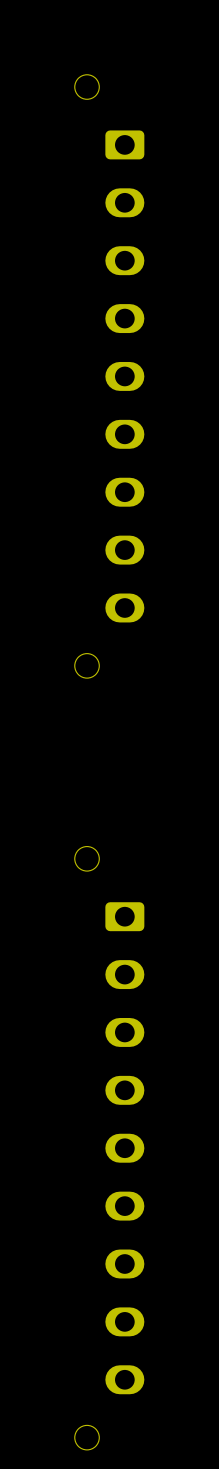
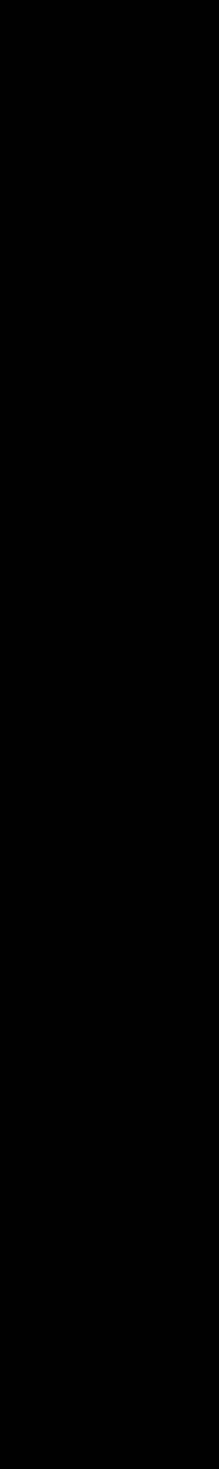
part: (109, 376) -> none
part: (109, 1148) -> none

